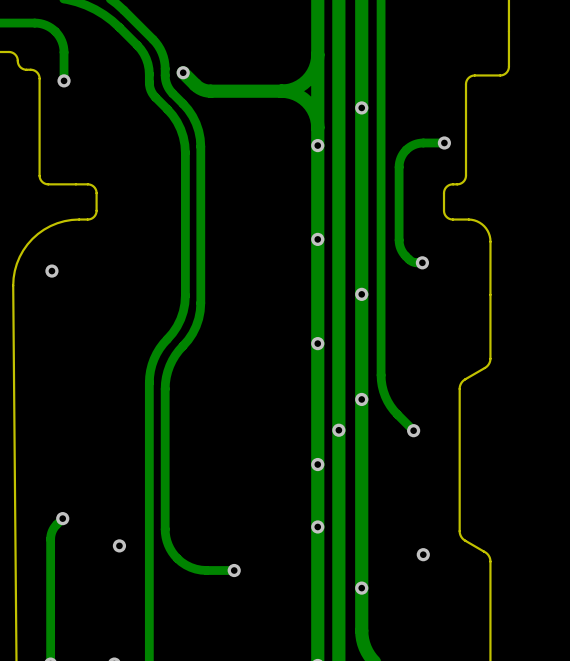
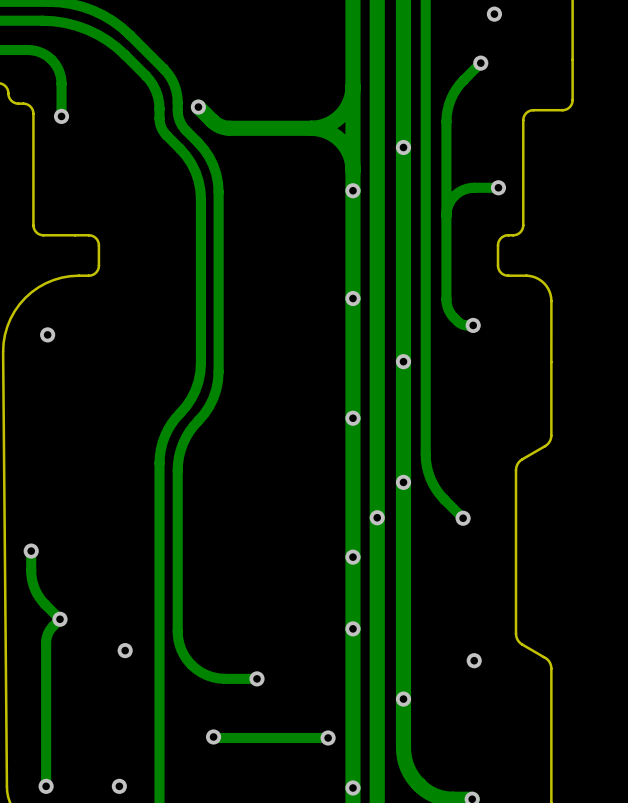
track: none -> (480, 63) (456, 89) (447, 110) (446, 215)
via: none -> (480, 63)
track: none -> (31, 551) (31, 575) (34, 588) (42, 600) (60, 619)
via: none -> (31, 551)
track: none -> (214, 737) (328, 737)
via: none -> (213, 736)
via: none -> (328, 737)

